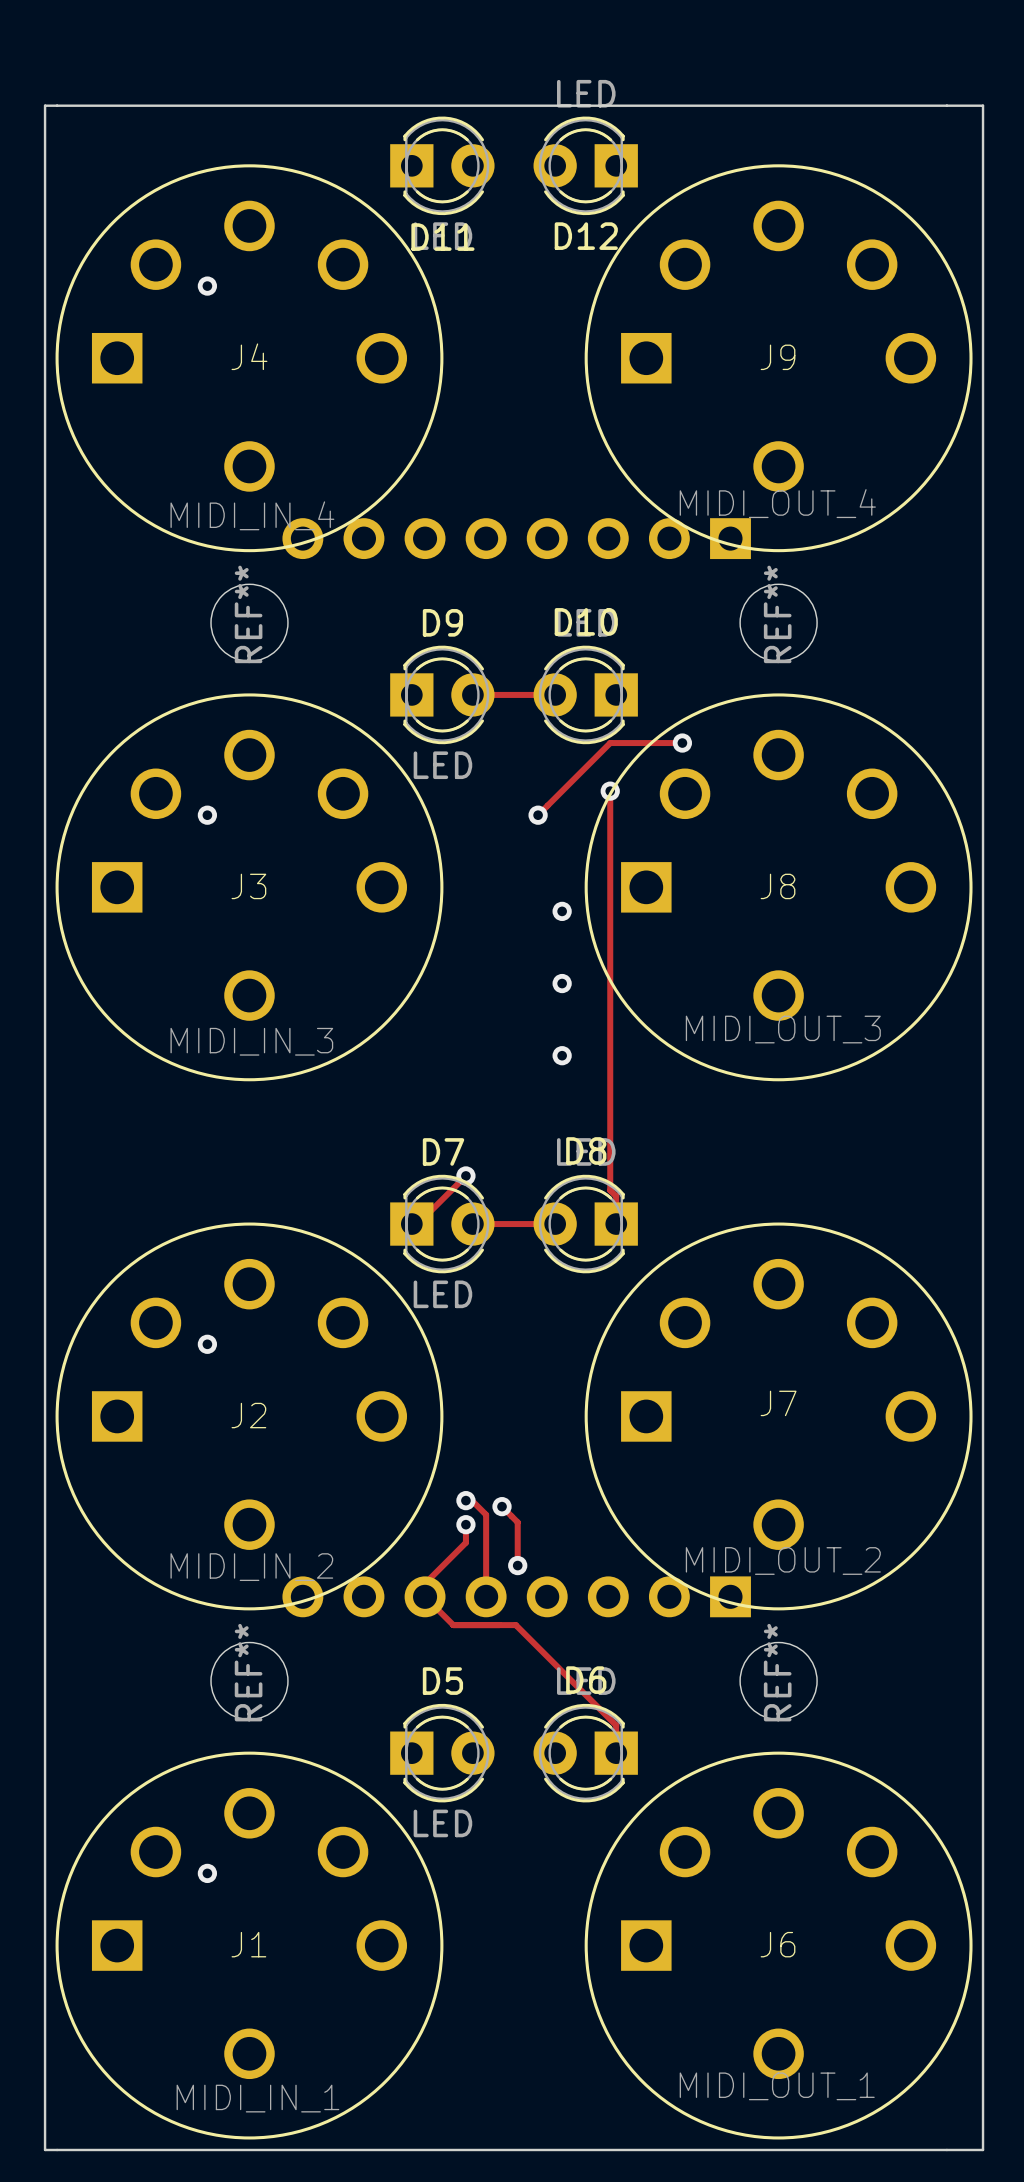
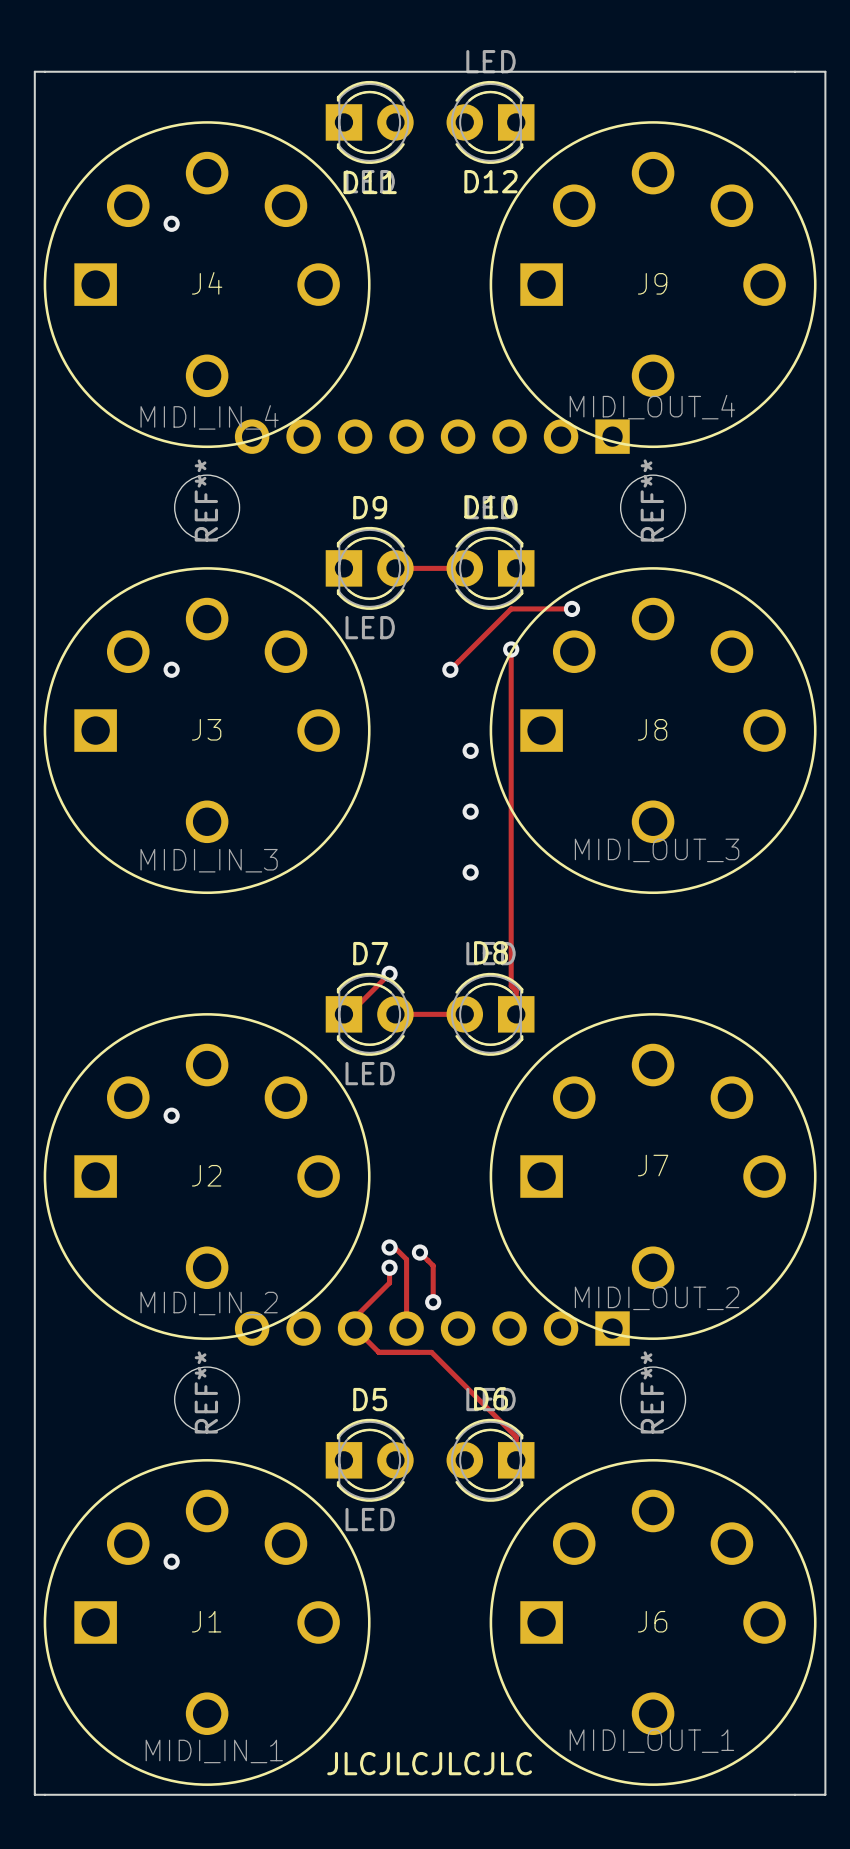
text: none -> JLCJLCJLCJLC (429, 1763)

